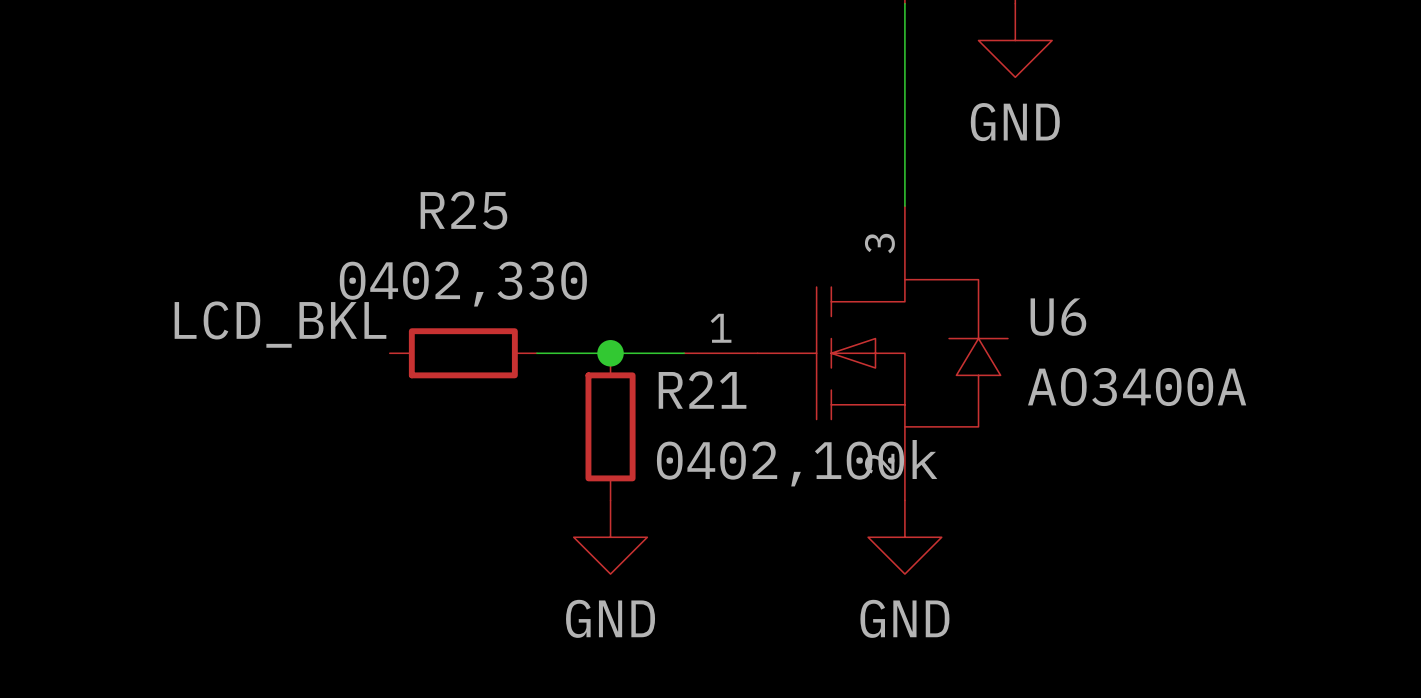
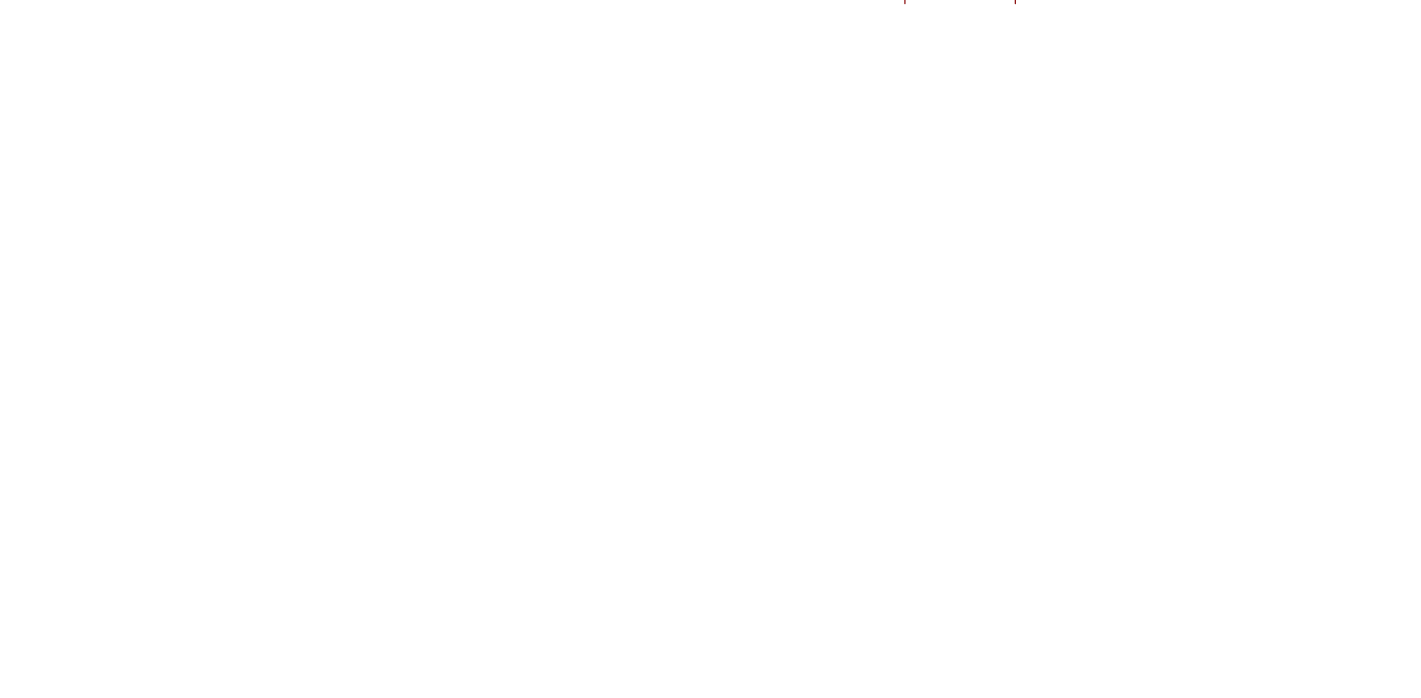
wire: (904, 3) (904, 206) -> none
power symbol: GND (1015, 40) -> none
label: LCD_BKL (280, 324) -> none
R25: 0402,330 (463, 353) -> none
wire: (536, 353) (684, 353) -> none
junction: (610, 353) -> none
U6: AO3400A (846, 353) -> none
R21: 0402,100k (610, 426) -> none
power symbol: GND (610, 537) -> none
power symbol: GND (904, 537) -> none

